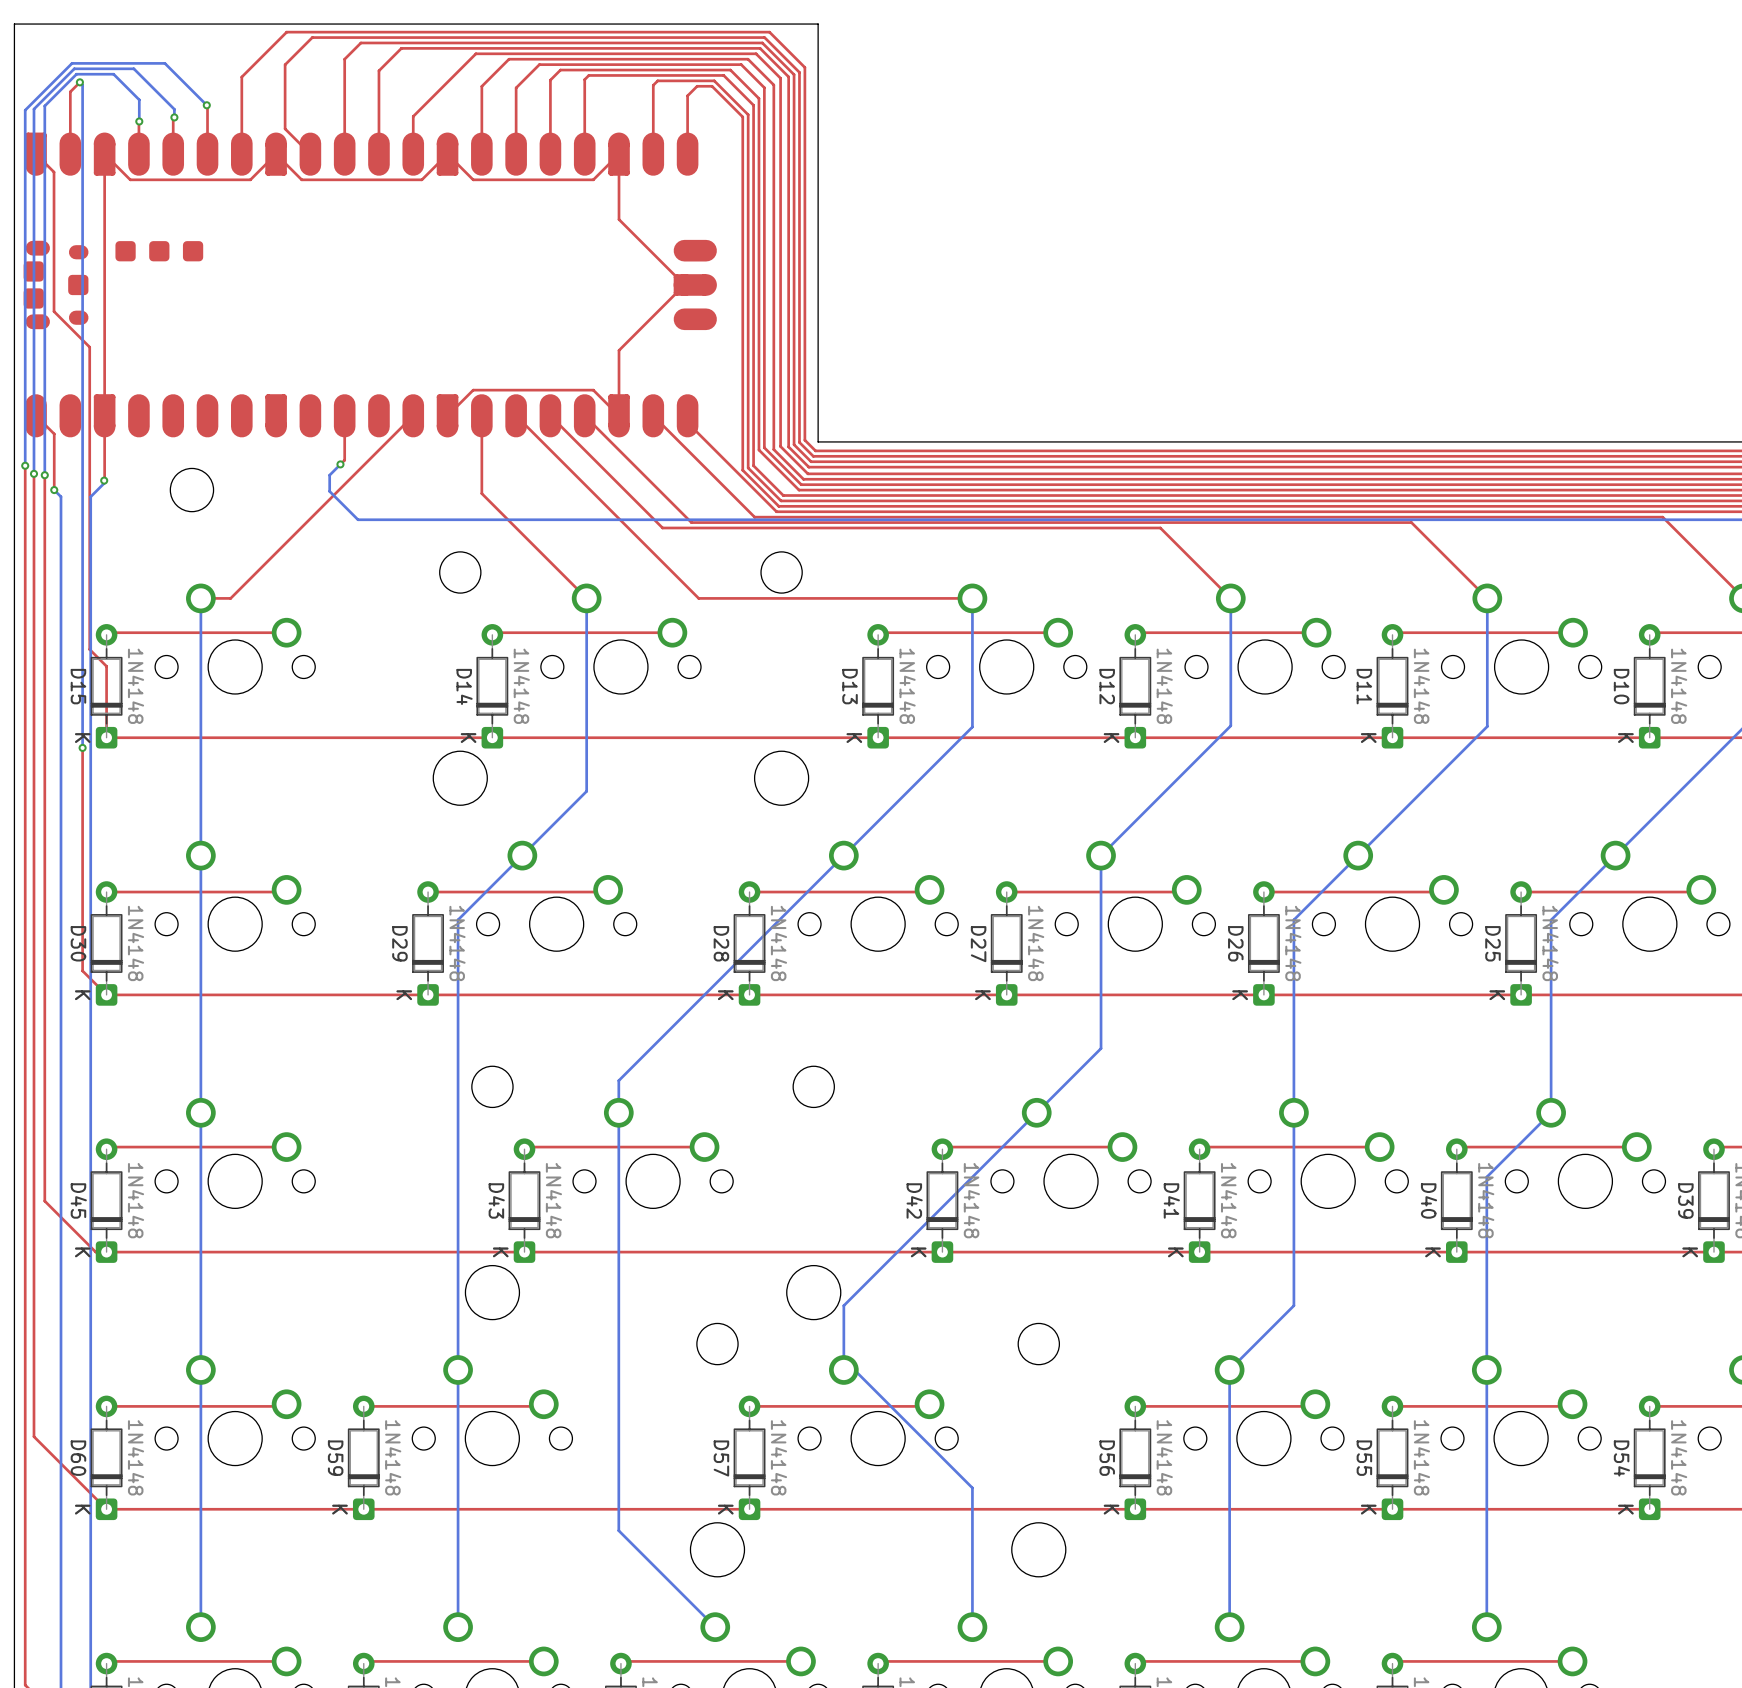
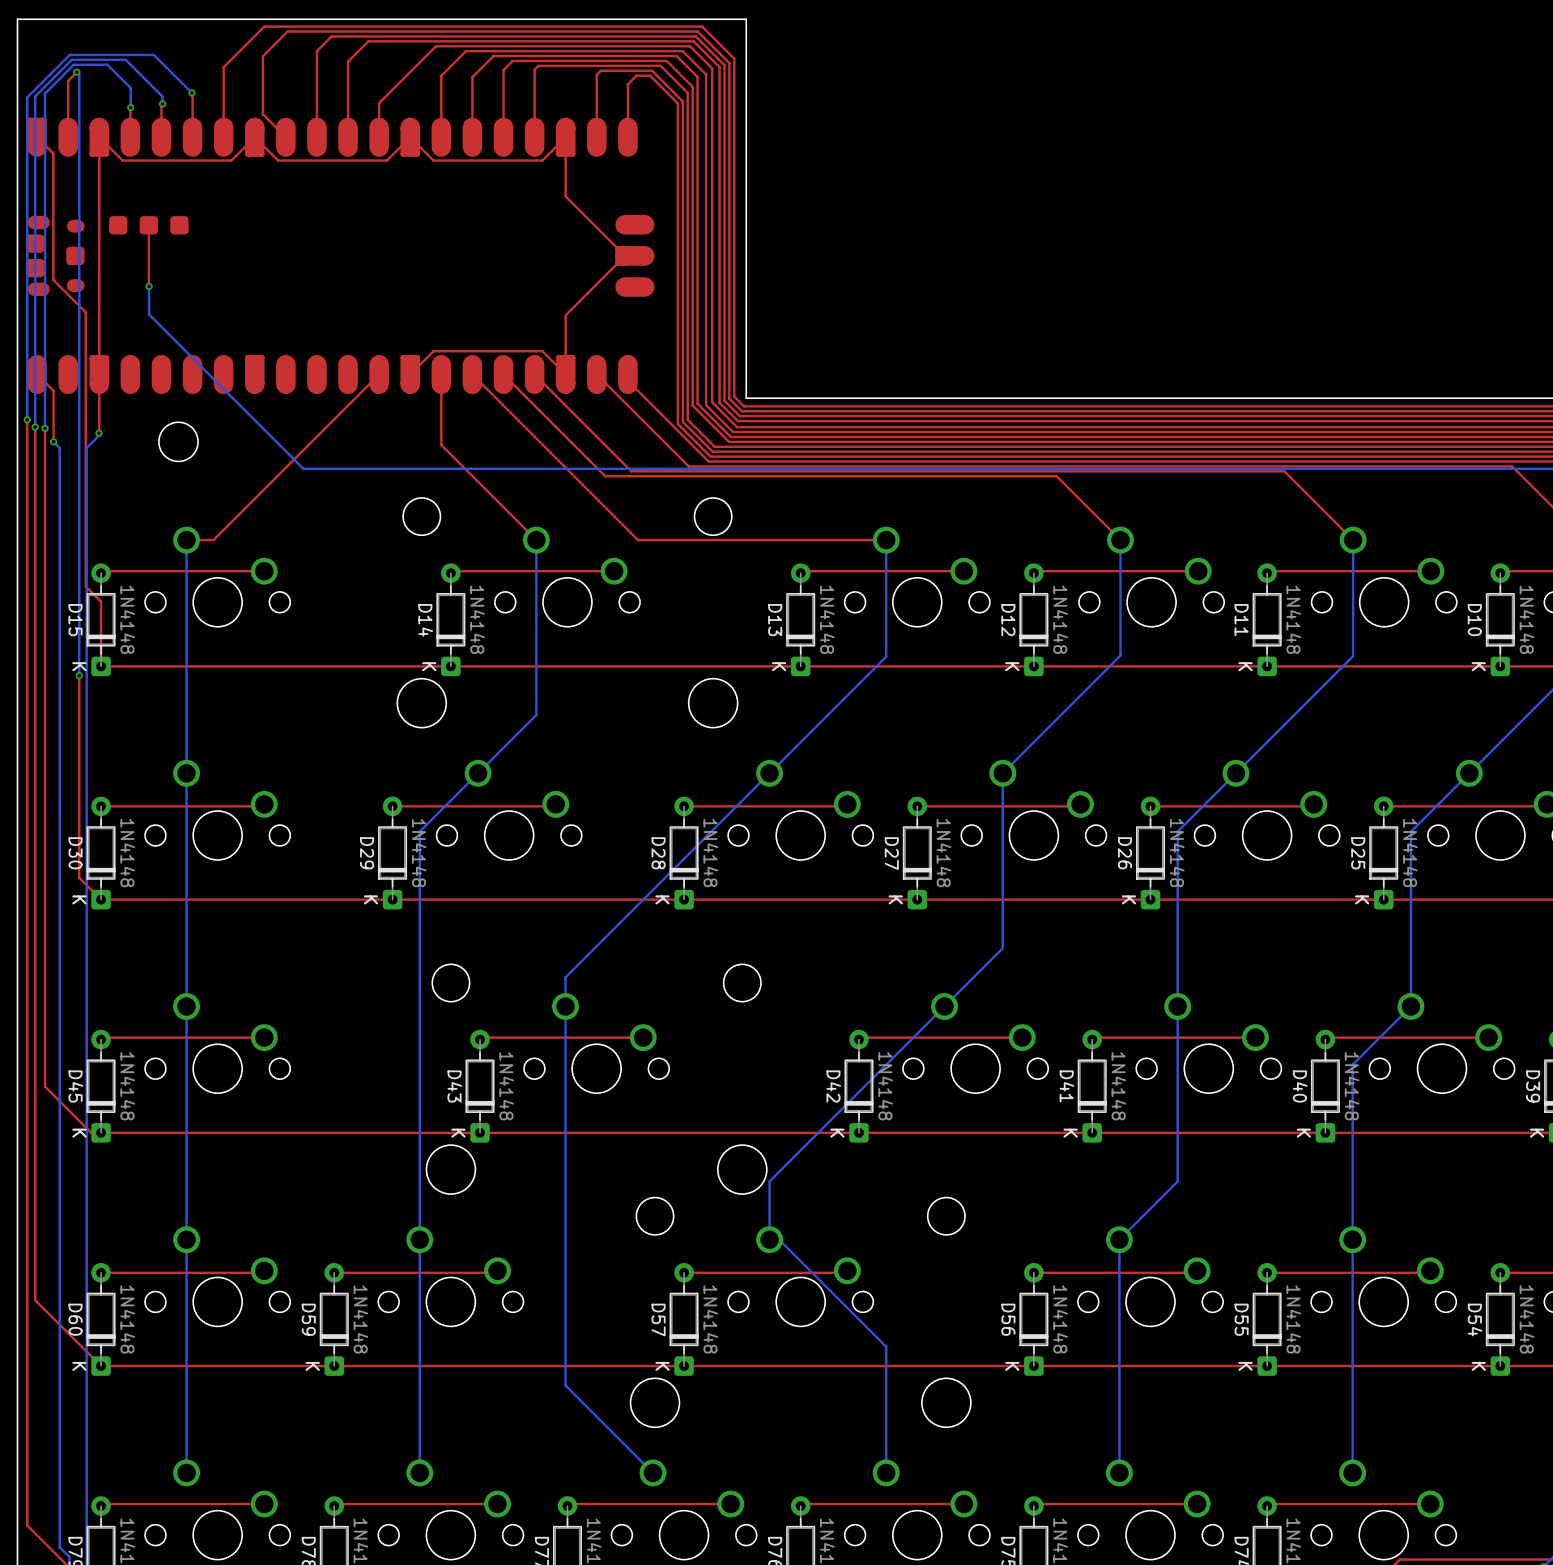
top track: none -> (148, 225) (149, 286)
via: none -> (149, 286)
top track: (344, 415) (344, 460) (340, 464) -> none
bottom track: (340, 464) (329, 475) (329, 491) (358, 519) -> (149, 286) (149, 314) (303, 468) (329, 468)
via: (340, 464) -> none

